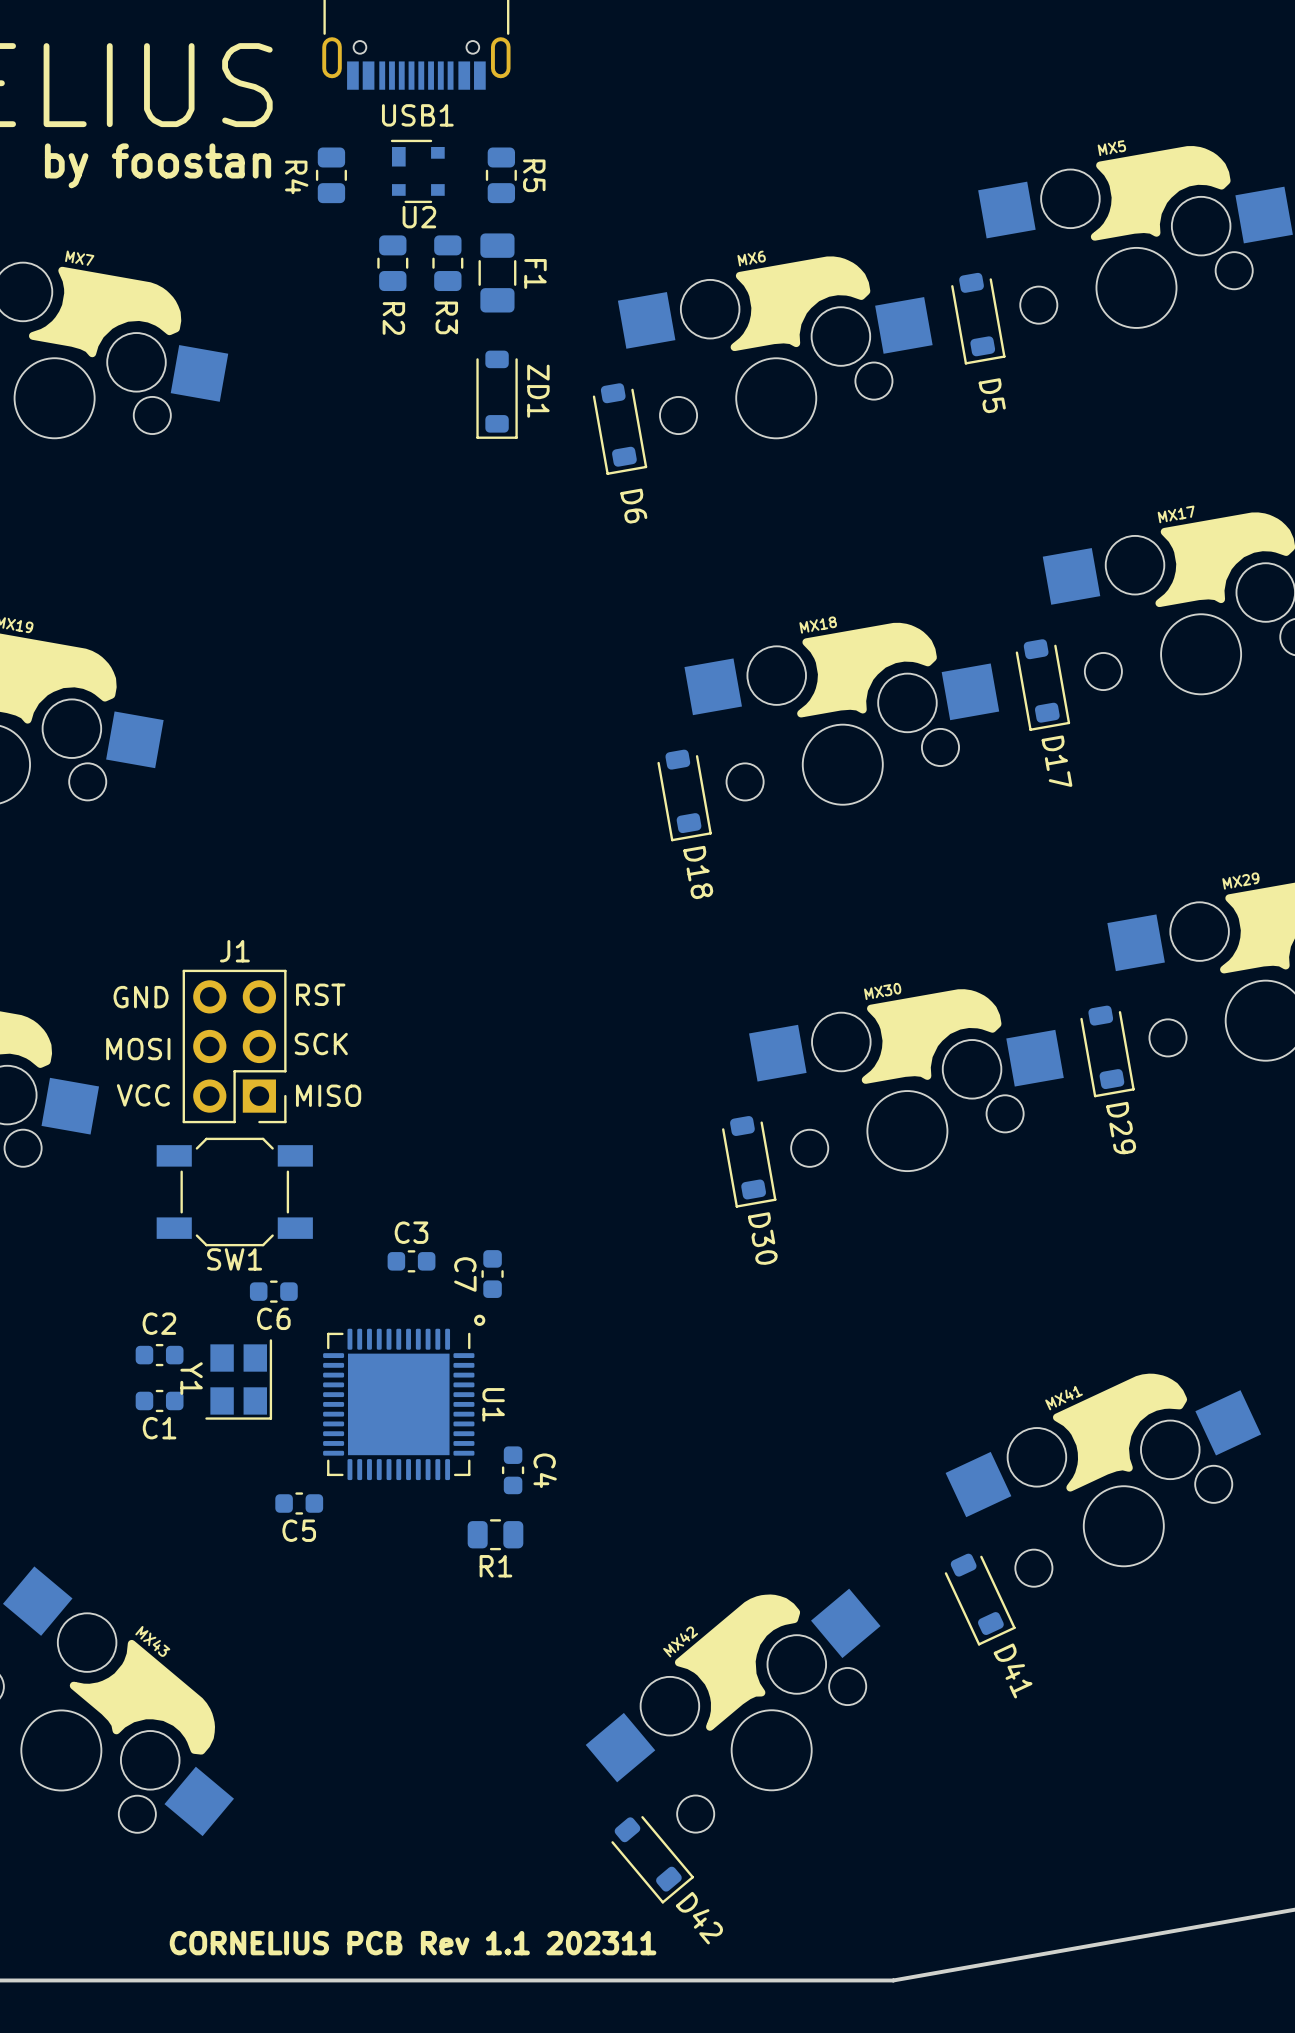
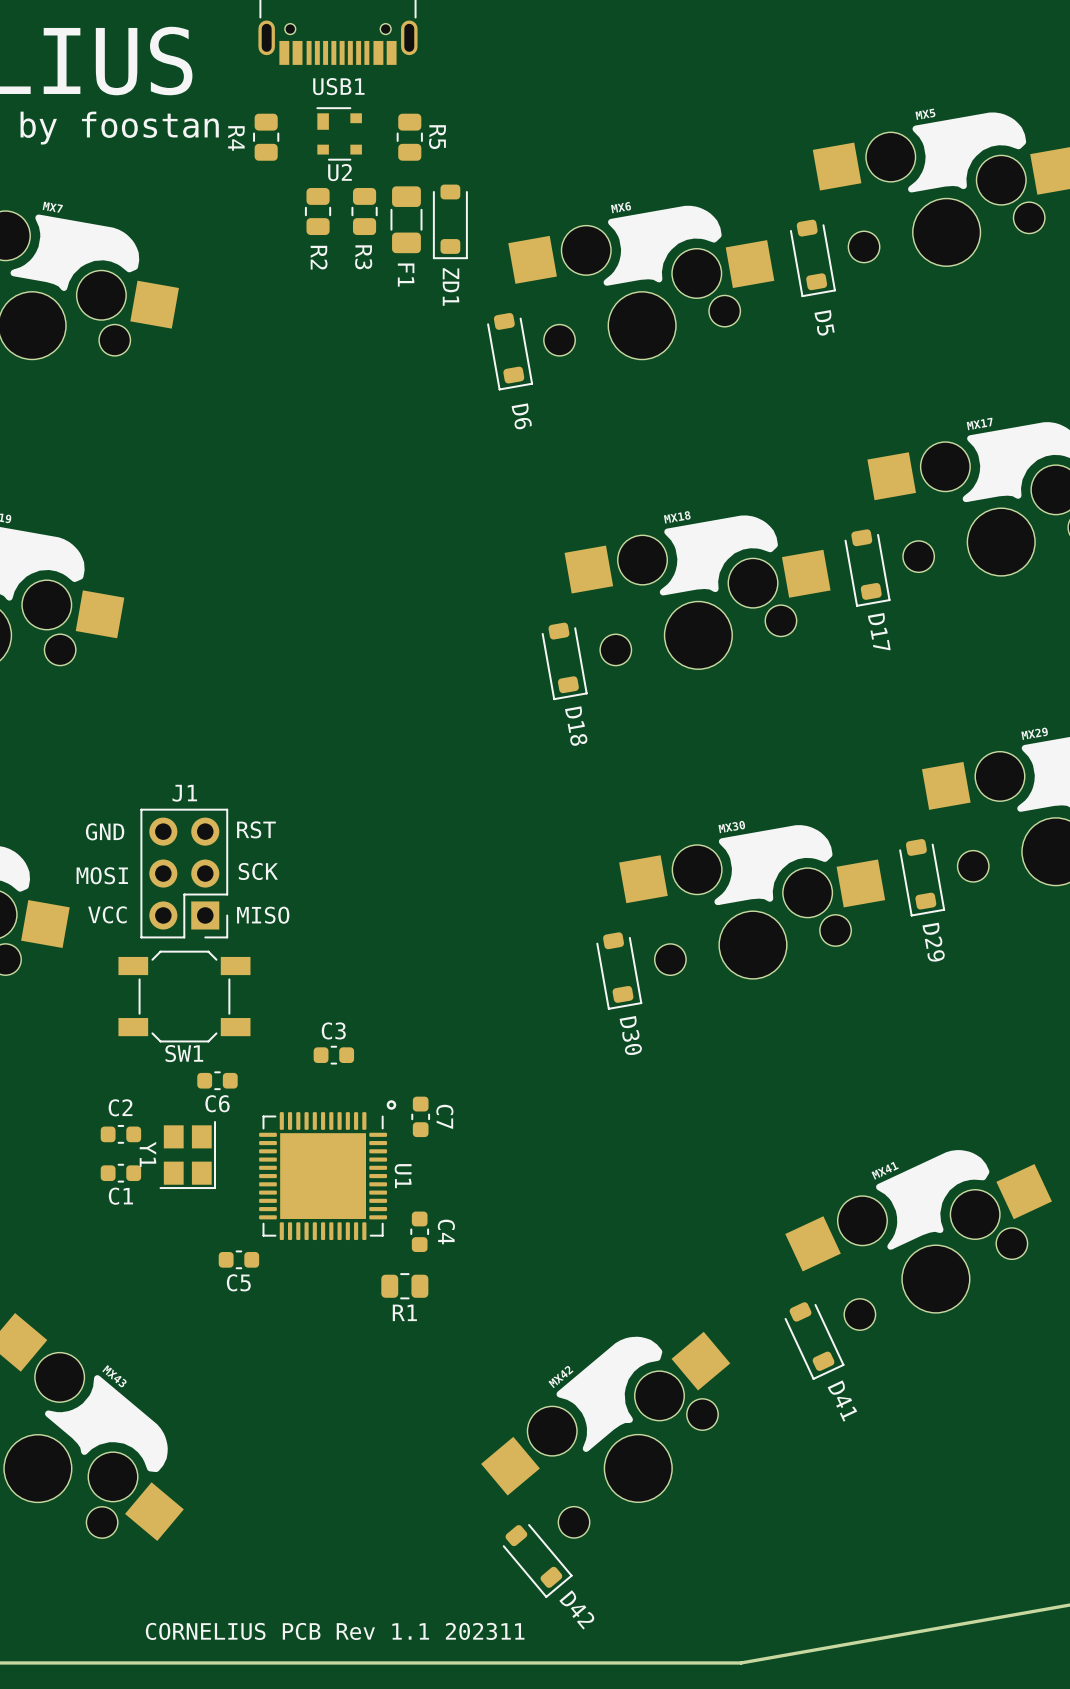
F1 name position: F1 (535, 273) -> F1 (406, 275)
ZD1 name position: ZD1 (538, 391) -> ZD1 (451, 287)
ZD1 position: (497, 394) -> (450, 221)
C7 name position: C7 (465, 1274) -> C7 (444, 1116)
C7 position: (492, 1274) -> (420, 1116)

